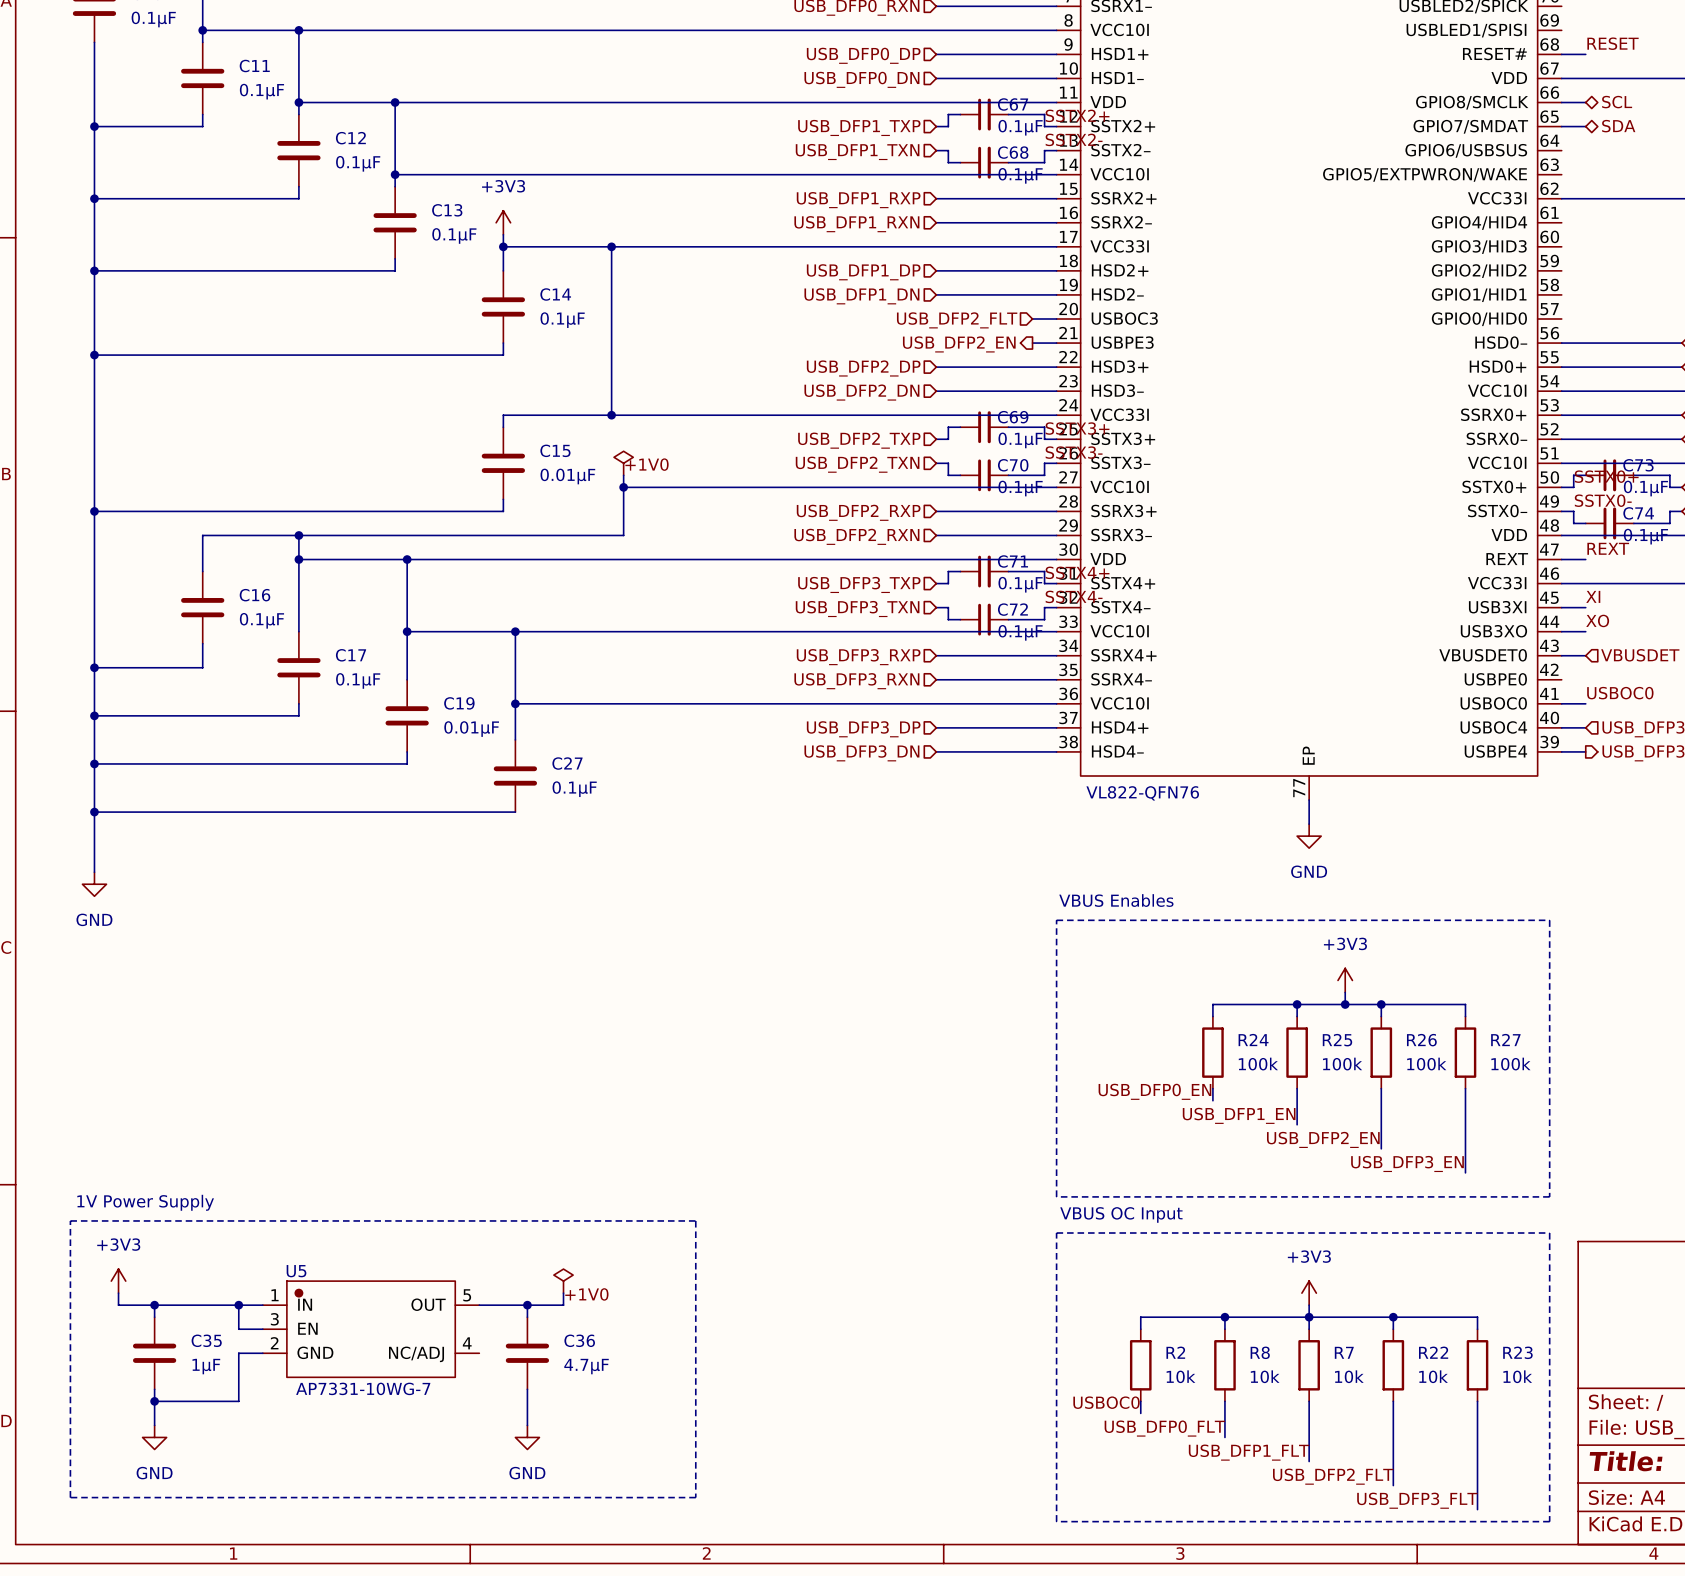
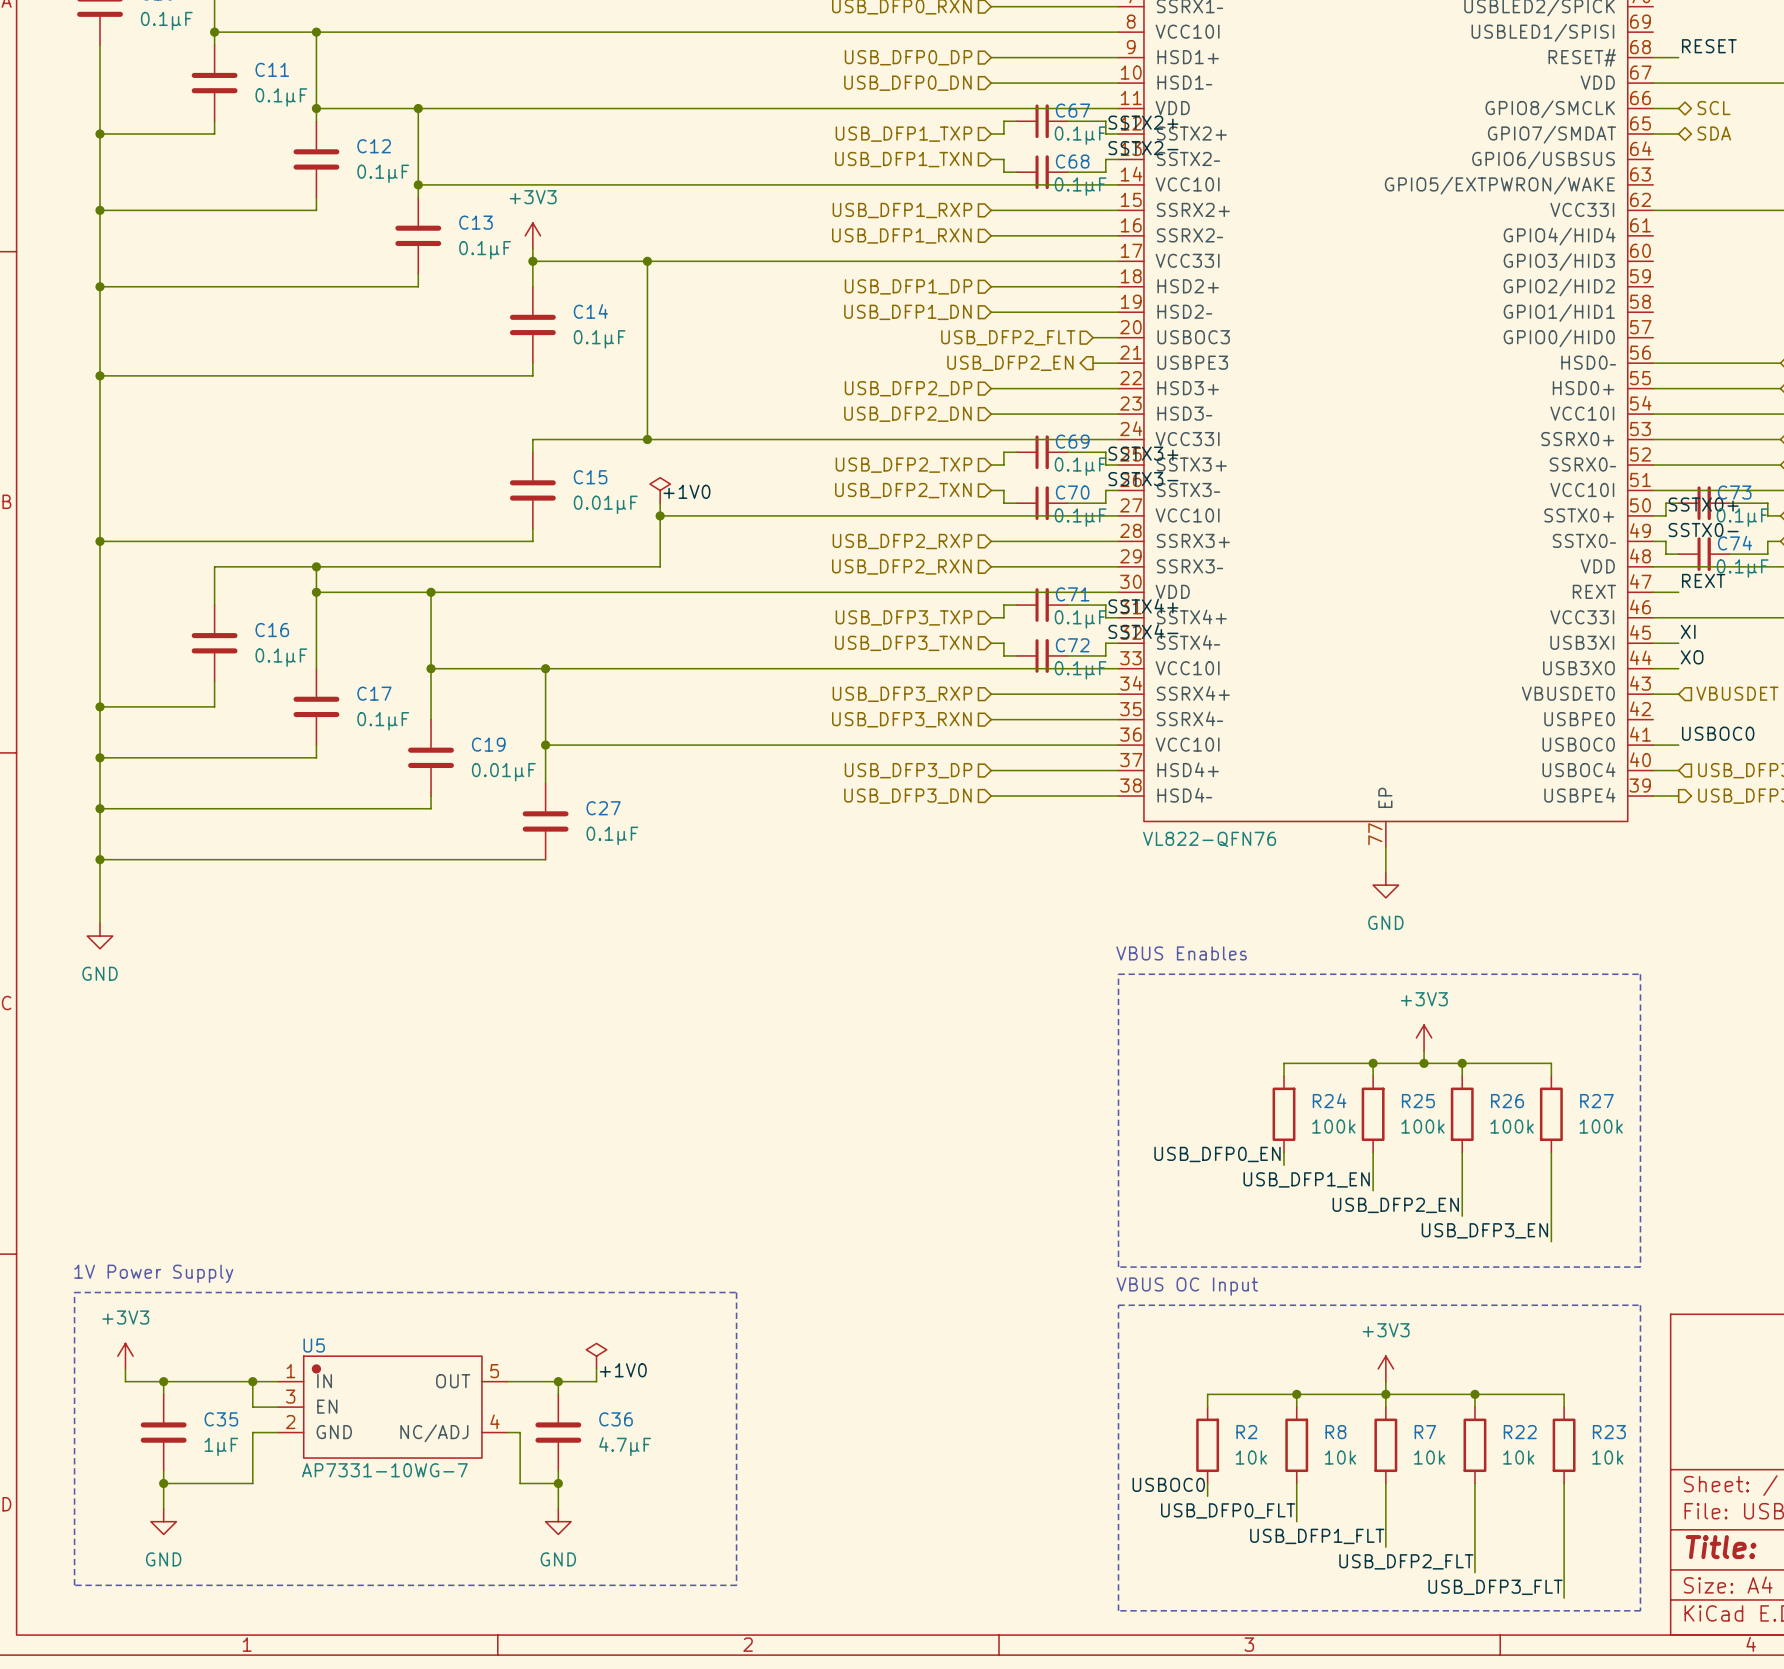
wire: none -> (507, 1432) (520, 1432) (520, 1483) (558, 1483)
junction: none -> (558, 1483)

